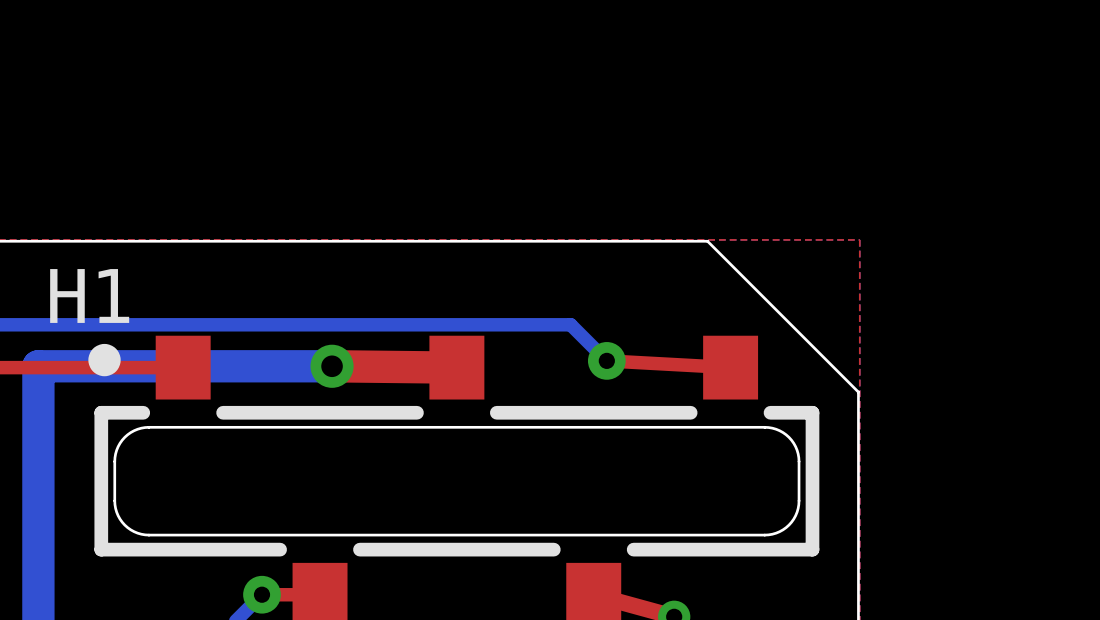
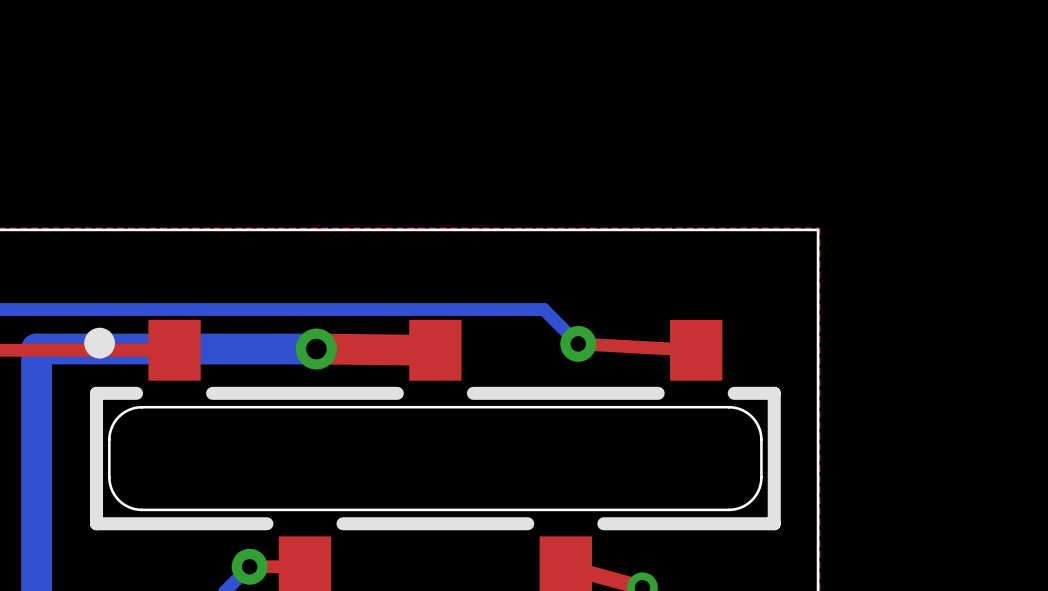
board edge: (707, 241) (858, 392) -> (674, 229) (818, 229) (818, 373)
H1 name: H1 (89, 295) -> none

